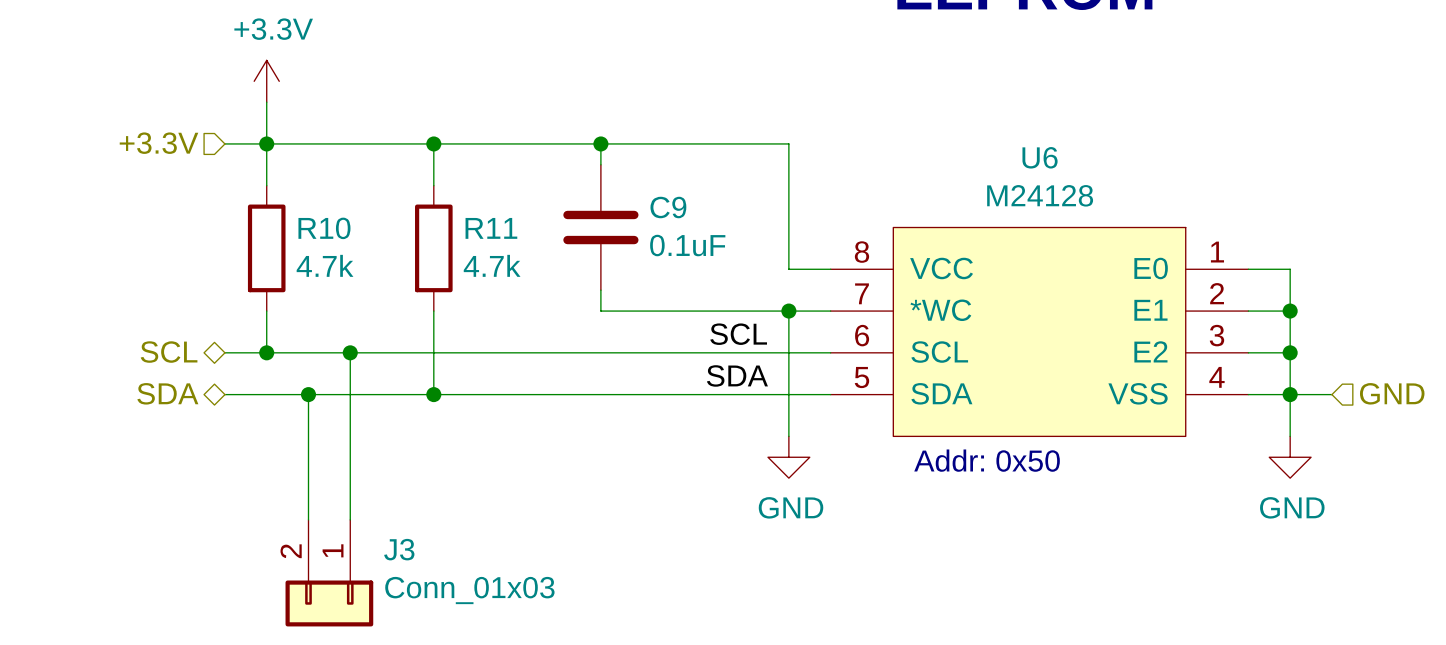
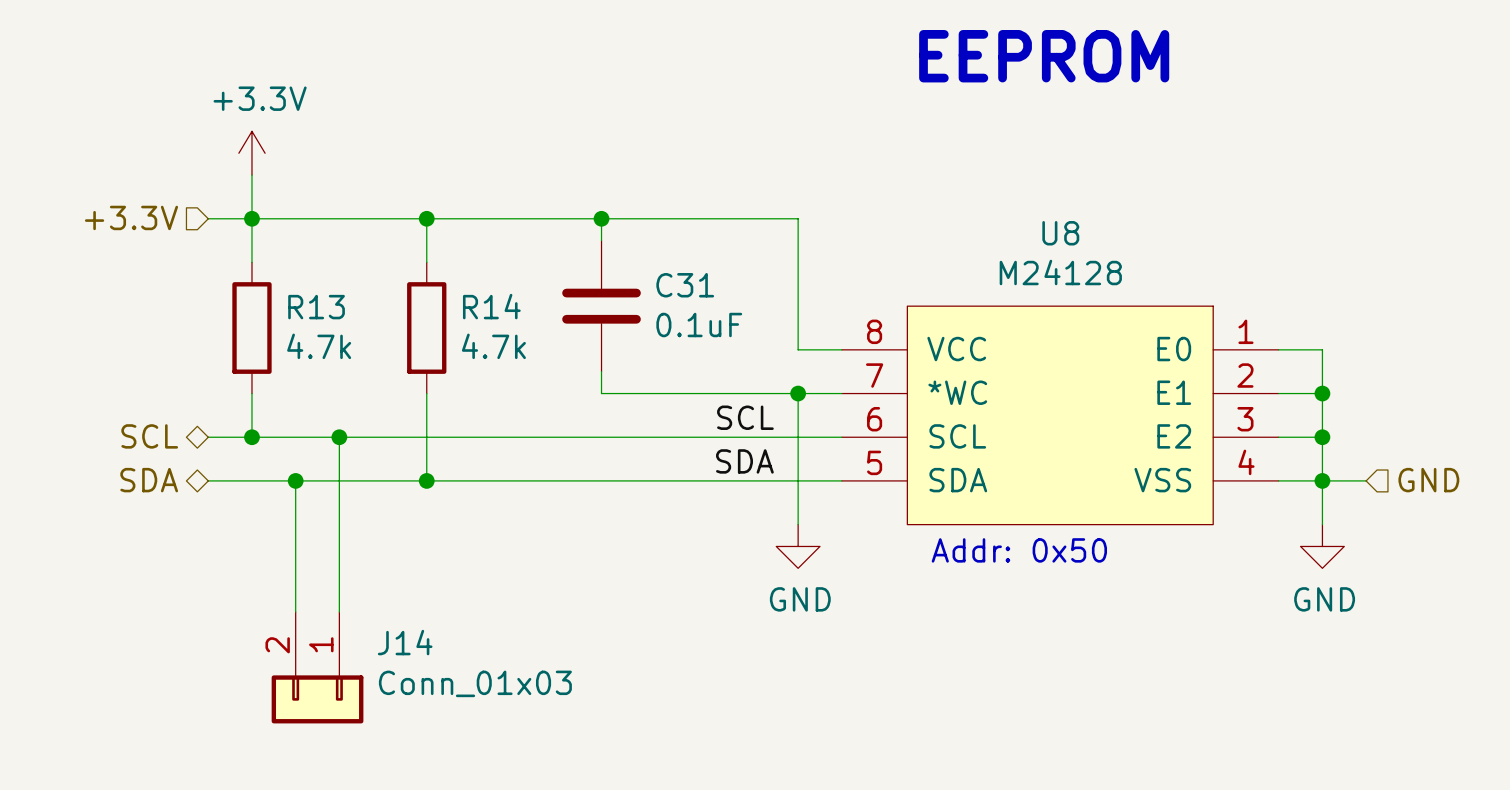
U6 name: U6 (1040, 157) -> U8 (1060, 233)
C9 name: C9 (668, 207) -> C31 (685, 285)
R10 name: R10 (324, 228) -> R13 (316, 307)
R11 name: R11 (491, 228) -> R14 (491, 306)
J3 name: J3 (399, 549) -> J14 (405, 642)

